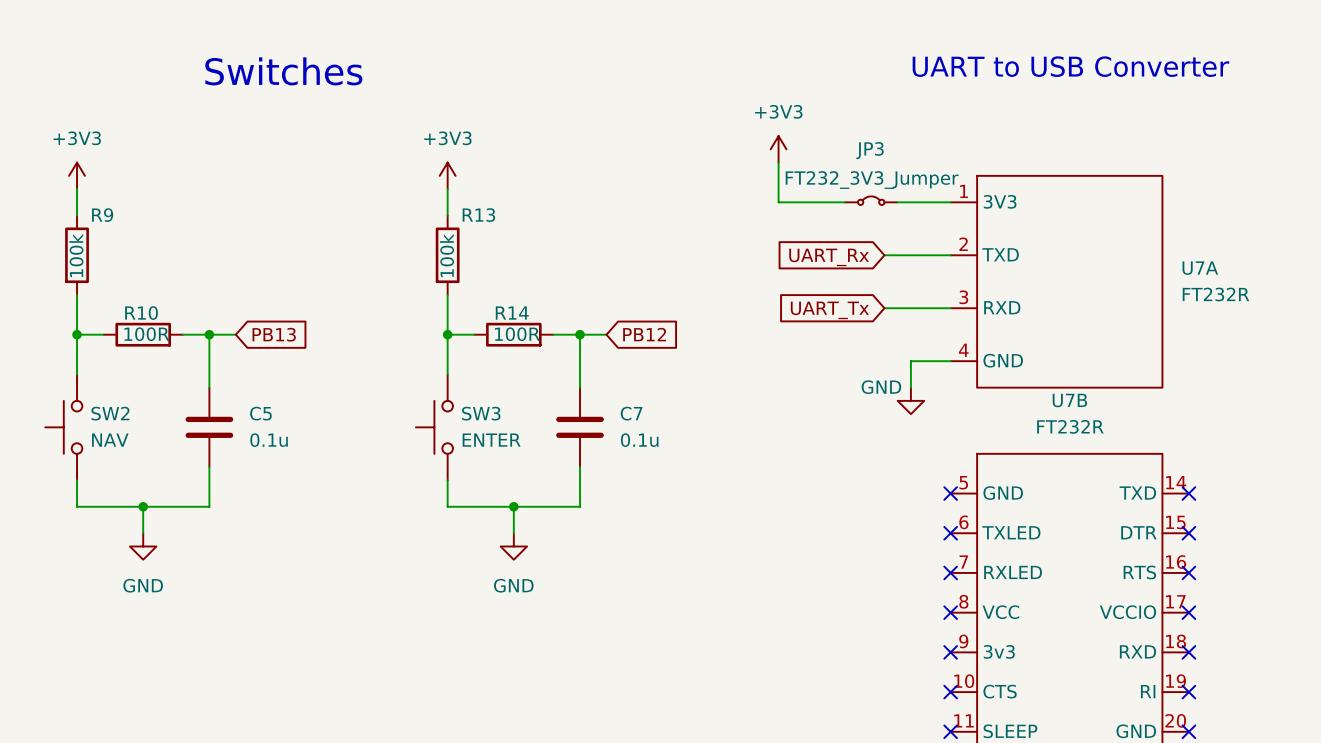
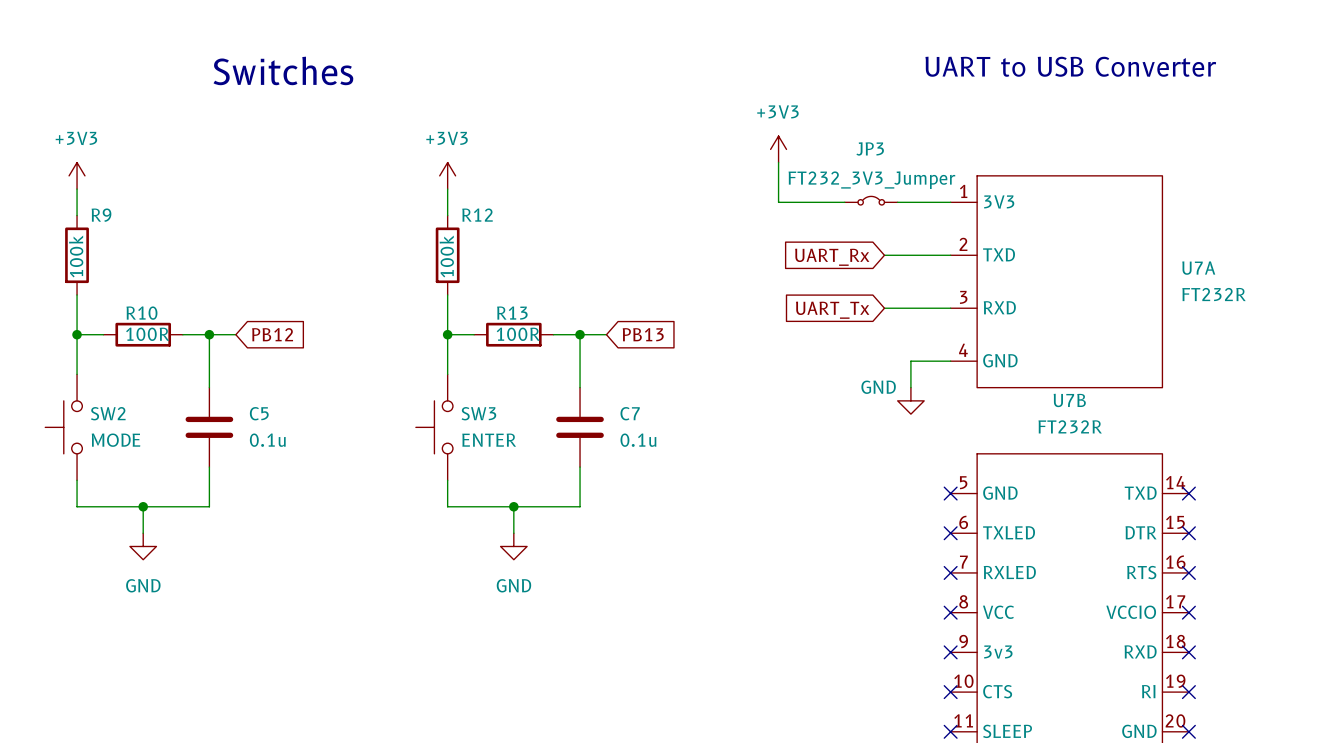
R13 name: R13 (478, 215) -> R12 (477, 215)
R14 name: R14 (512, 313) -> R13 (512, 313)
global label: PB13 (274, 334) -> PB12 (272, 334)
global label: PB12 (644, 334) -> PB13 (643, 334)
SW2 value: NAV (110, 440) -> MODE (116, 440)

